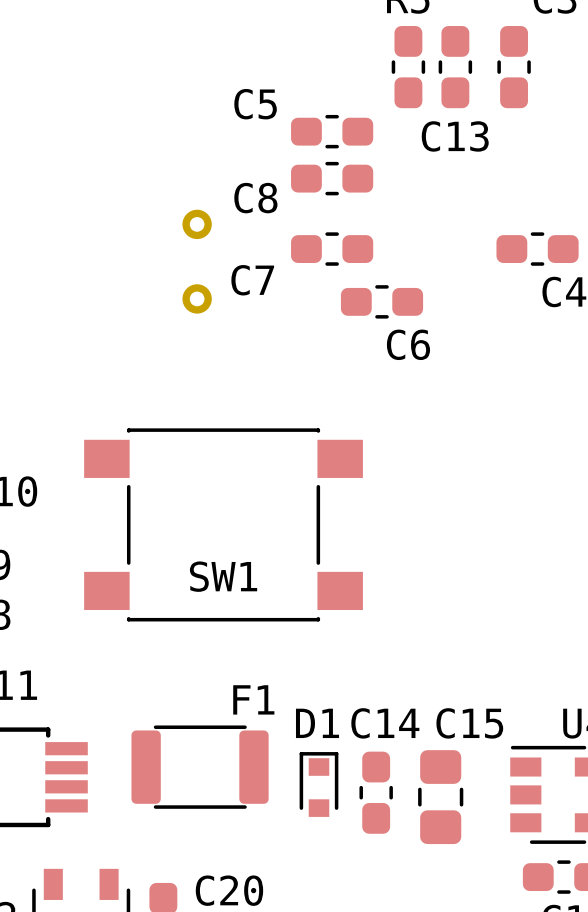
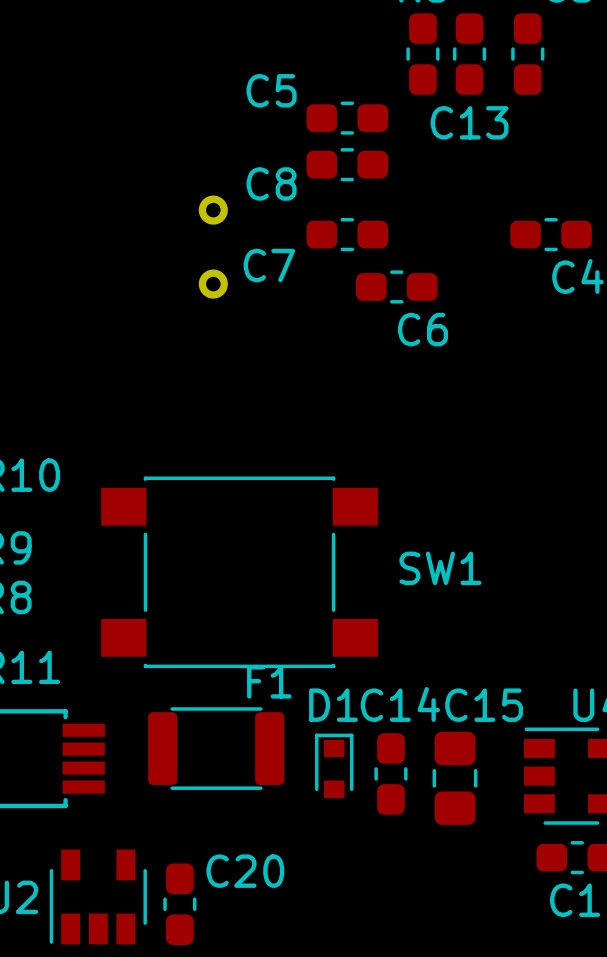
SW1 position: (223, 524) -> (239, 572)
SW1 name position: SW1 (223, 576) -> SW1 (440, 568)

